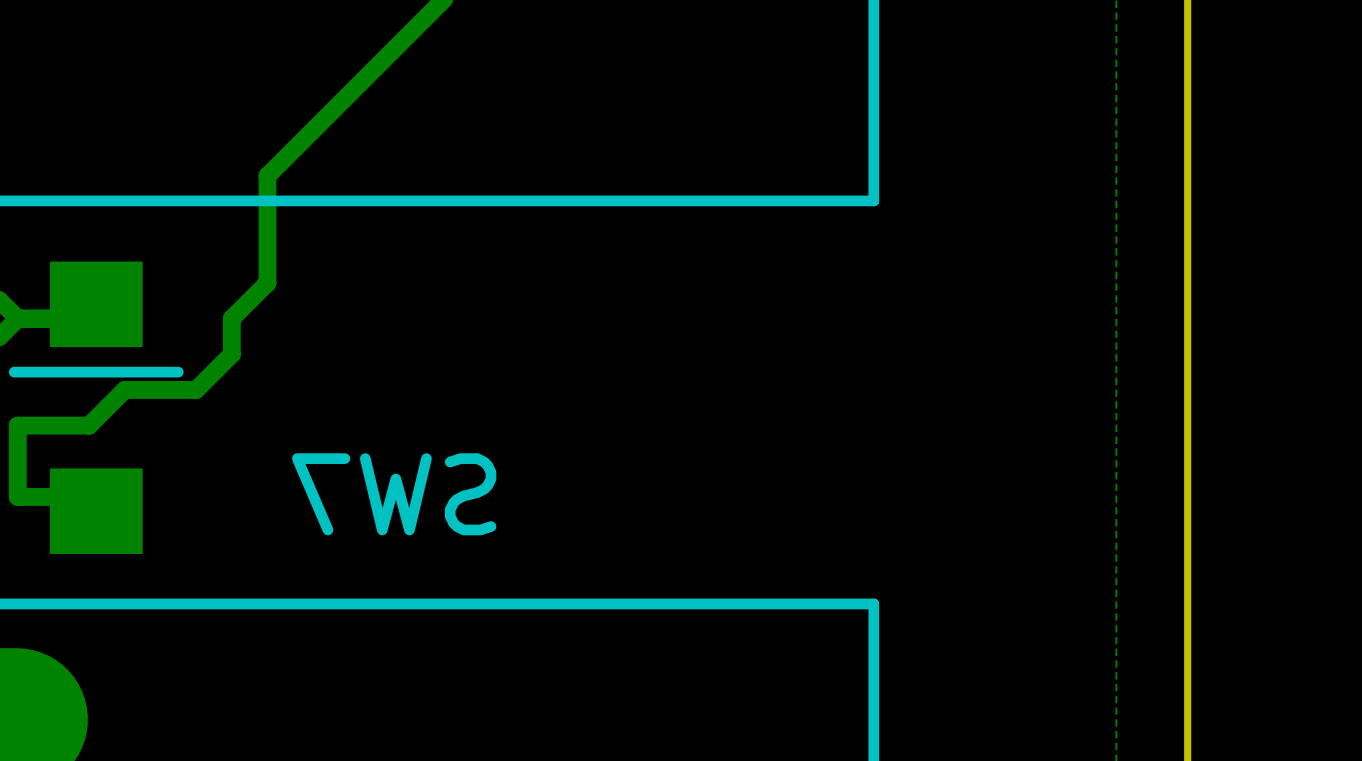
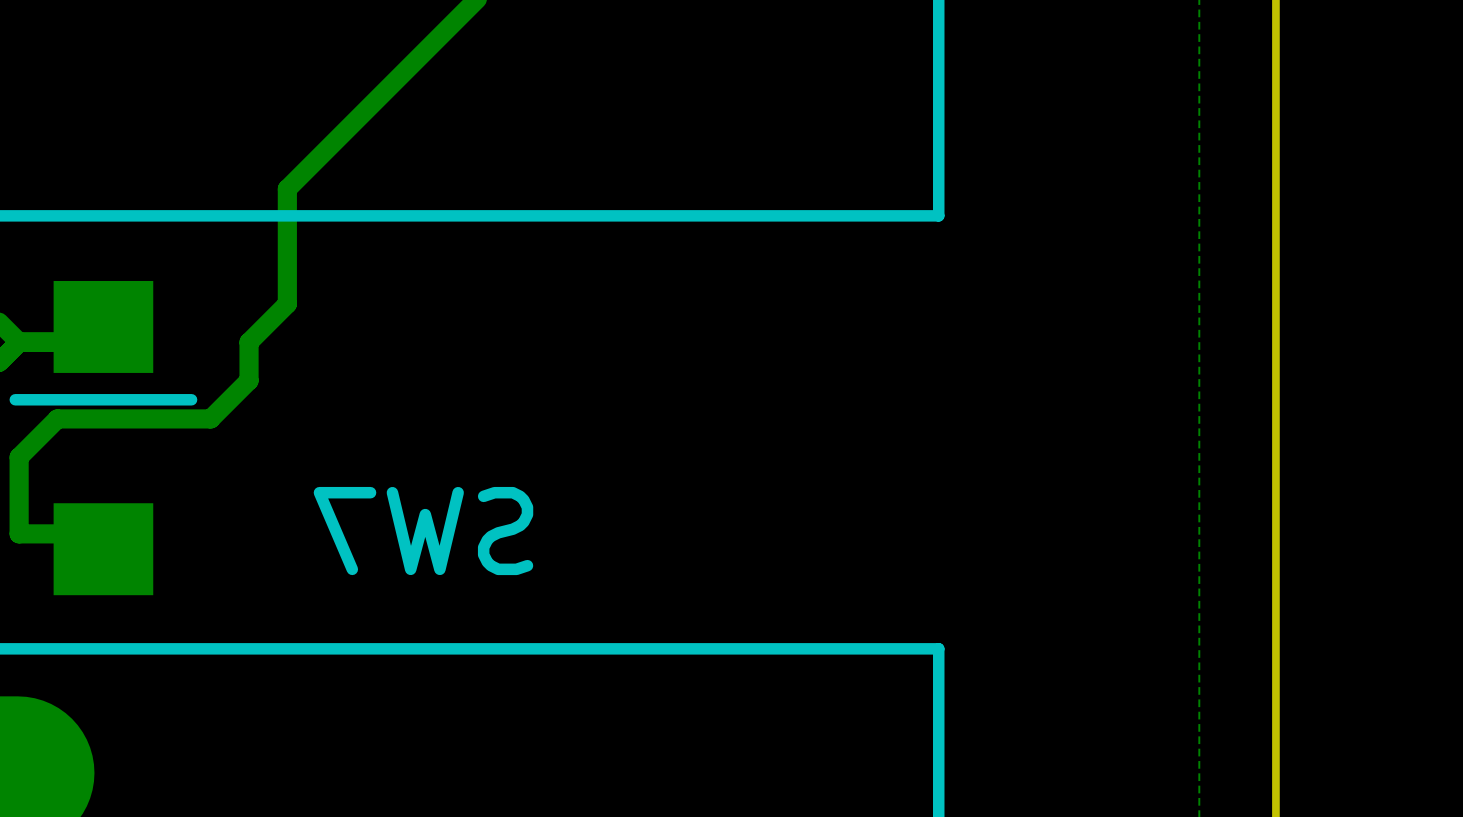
bottom track: (124, 389) (89, 425) (17, 425) -> (134, 418) (57, 418) (19, 457)

